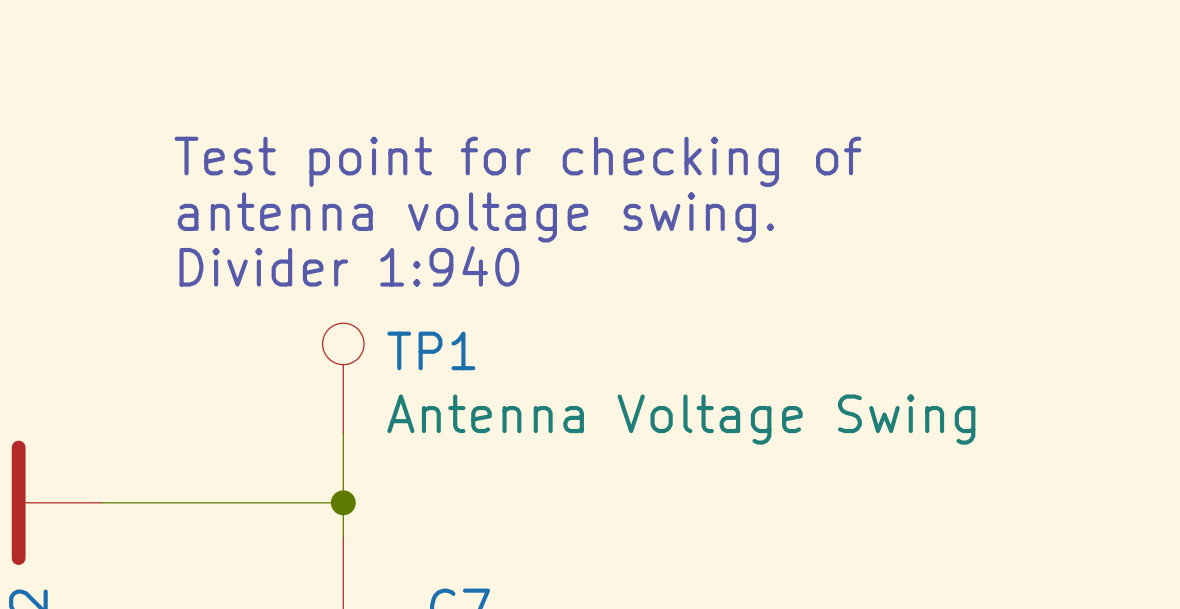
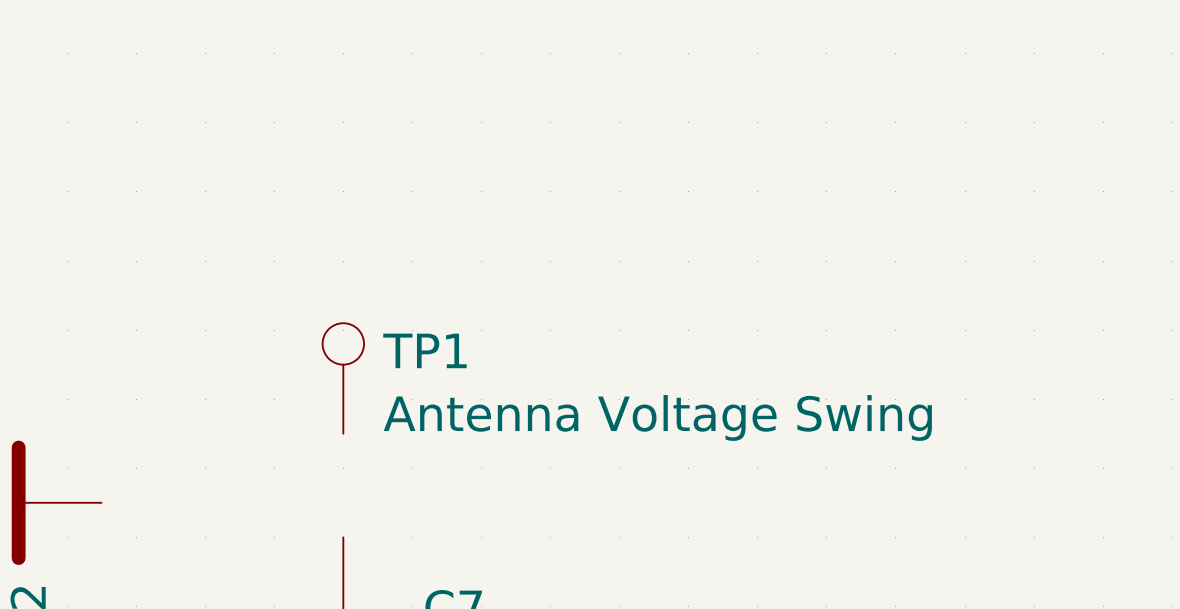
text: Test point for checking of (517, 161) -> none
text: antenna voltage swing. (475, 217) -> none
text: Divider 1:940 (349, 266) -> none
wire: (343, 433) (343, 537) -> none
wire: (101, 502) (343, 502) -> none
junction: (343, 502) -> none

